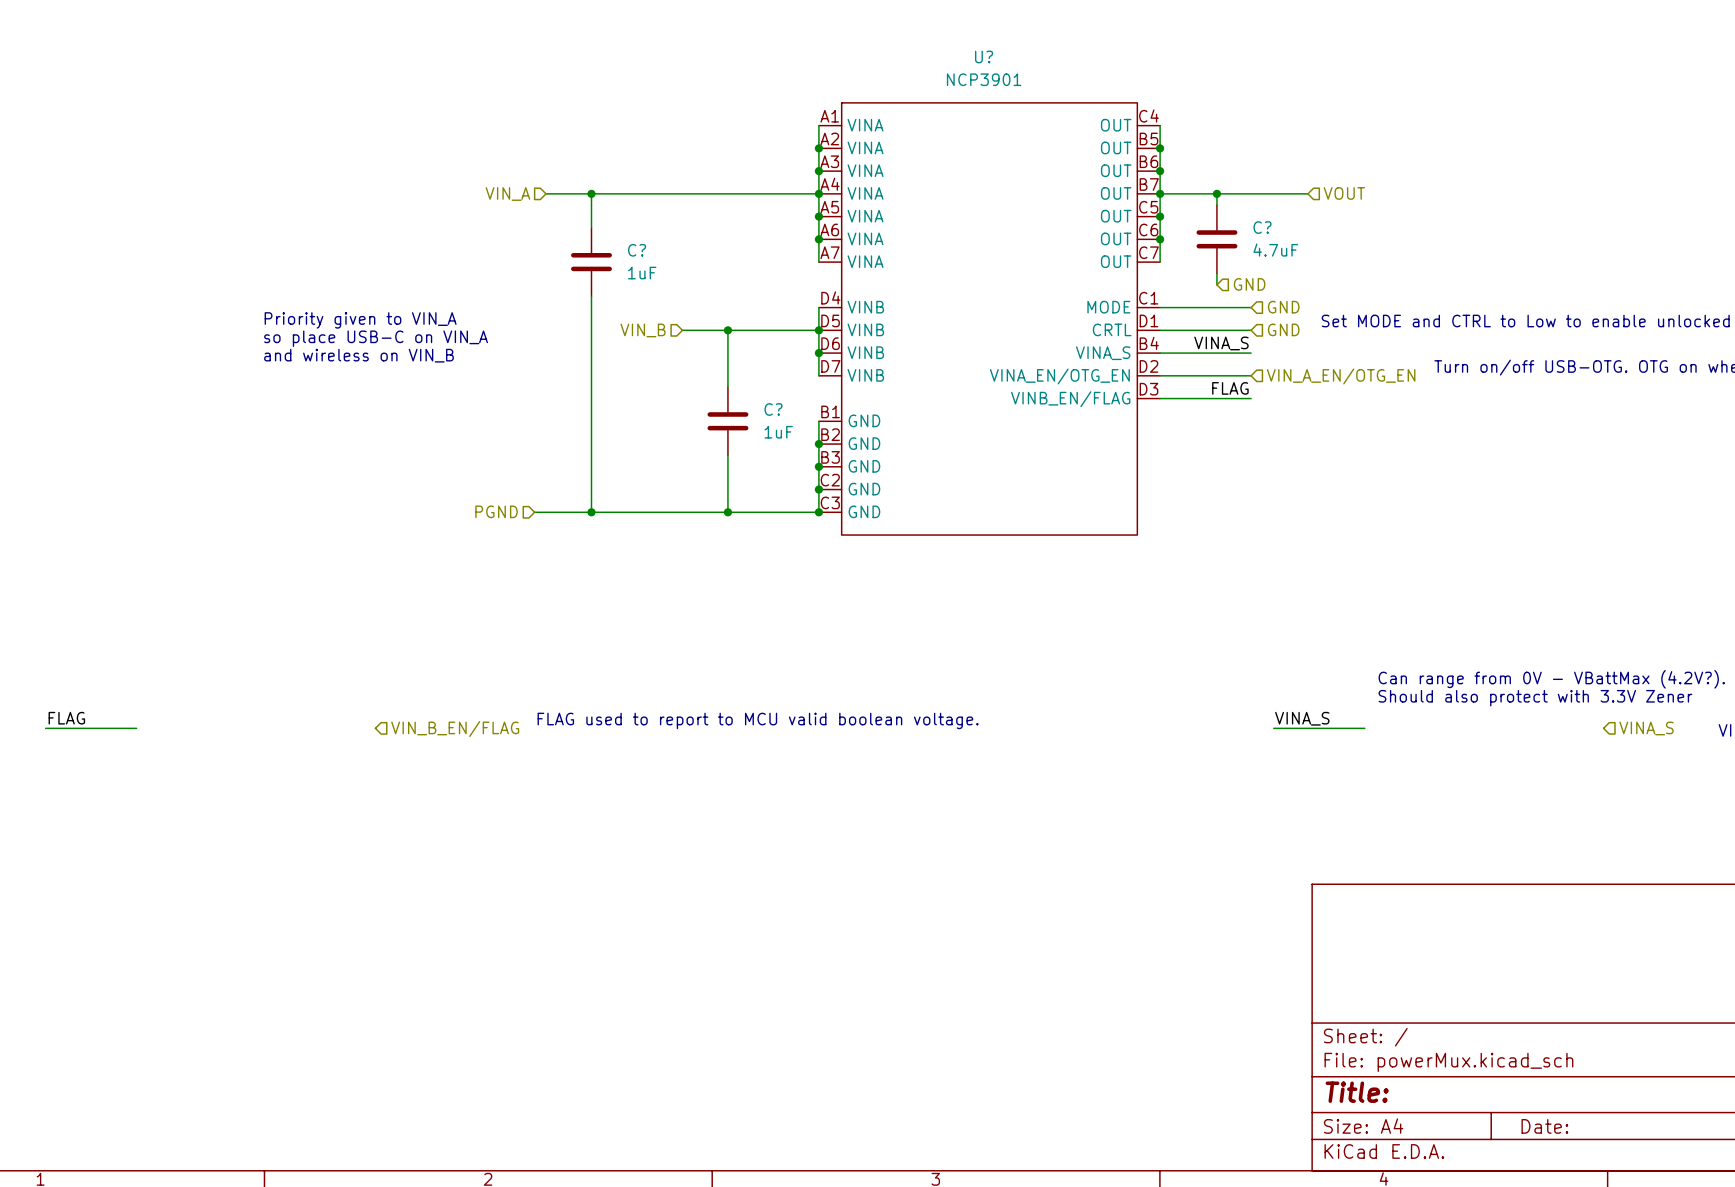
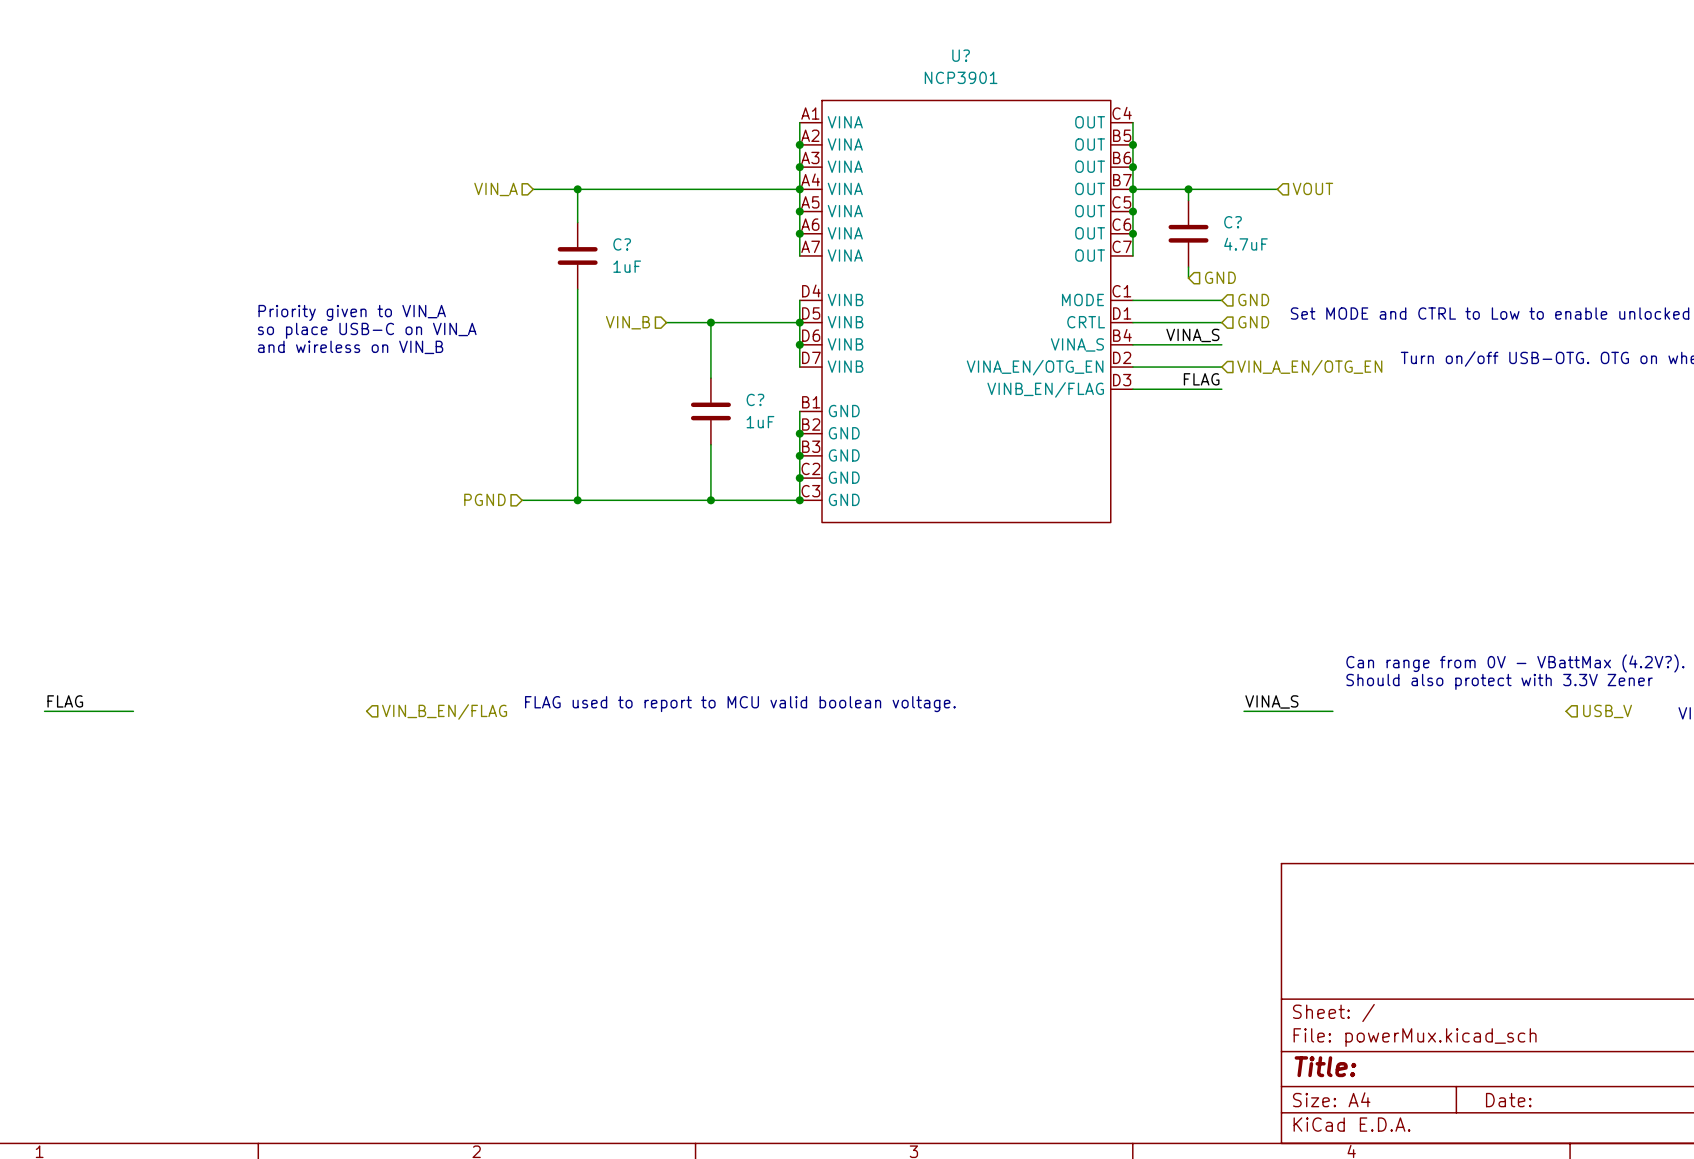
hierarchical label: VINA_S (1646, 728) -> USB_V (1607, 711)

